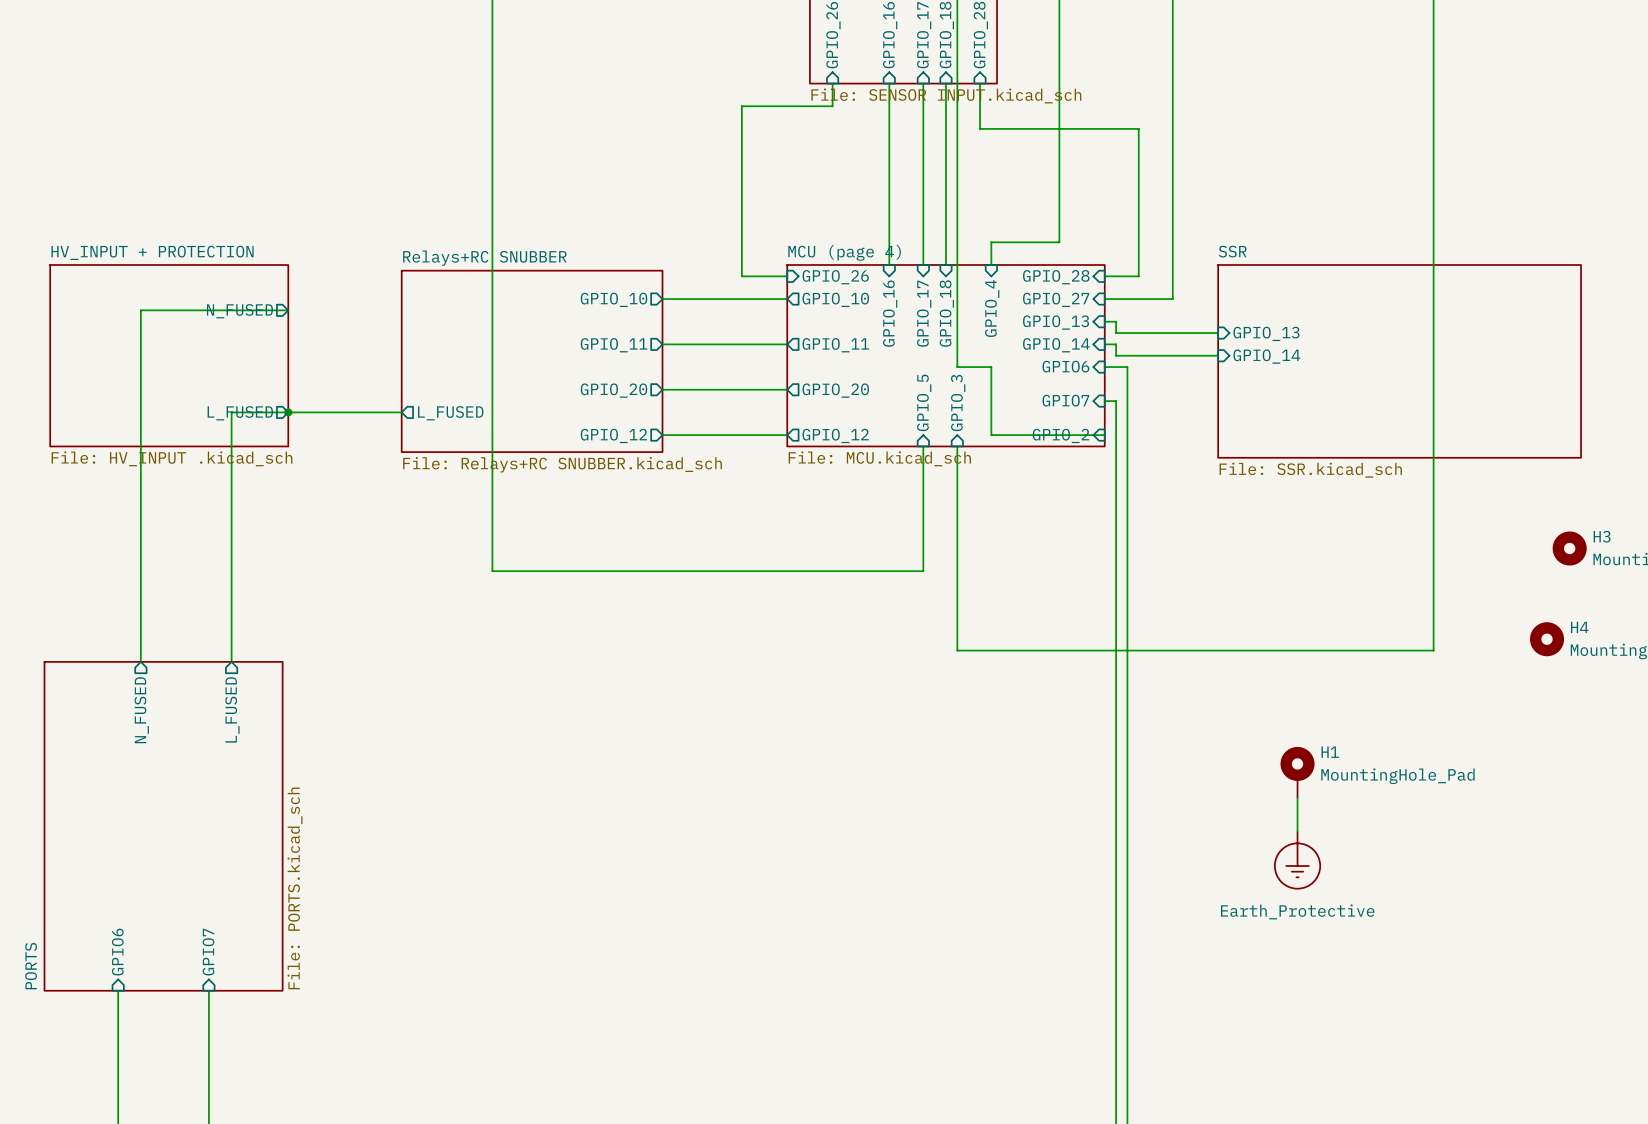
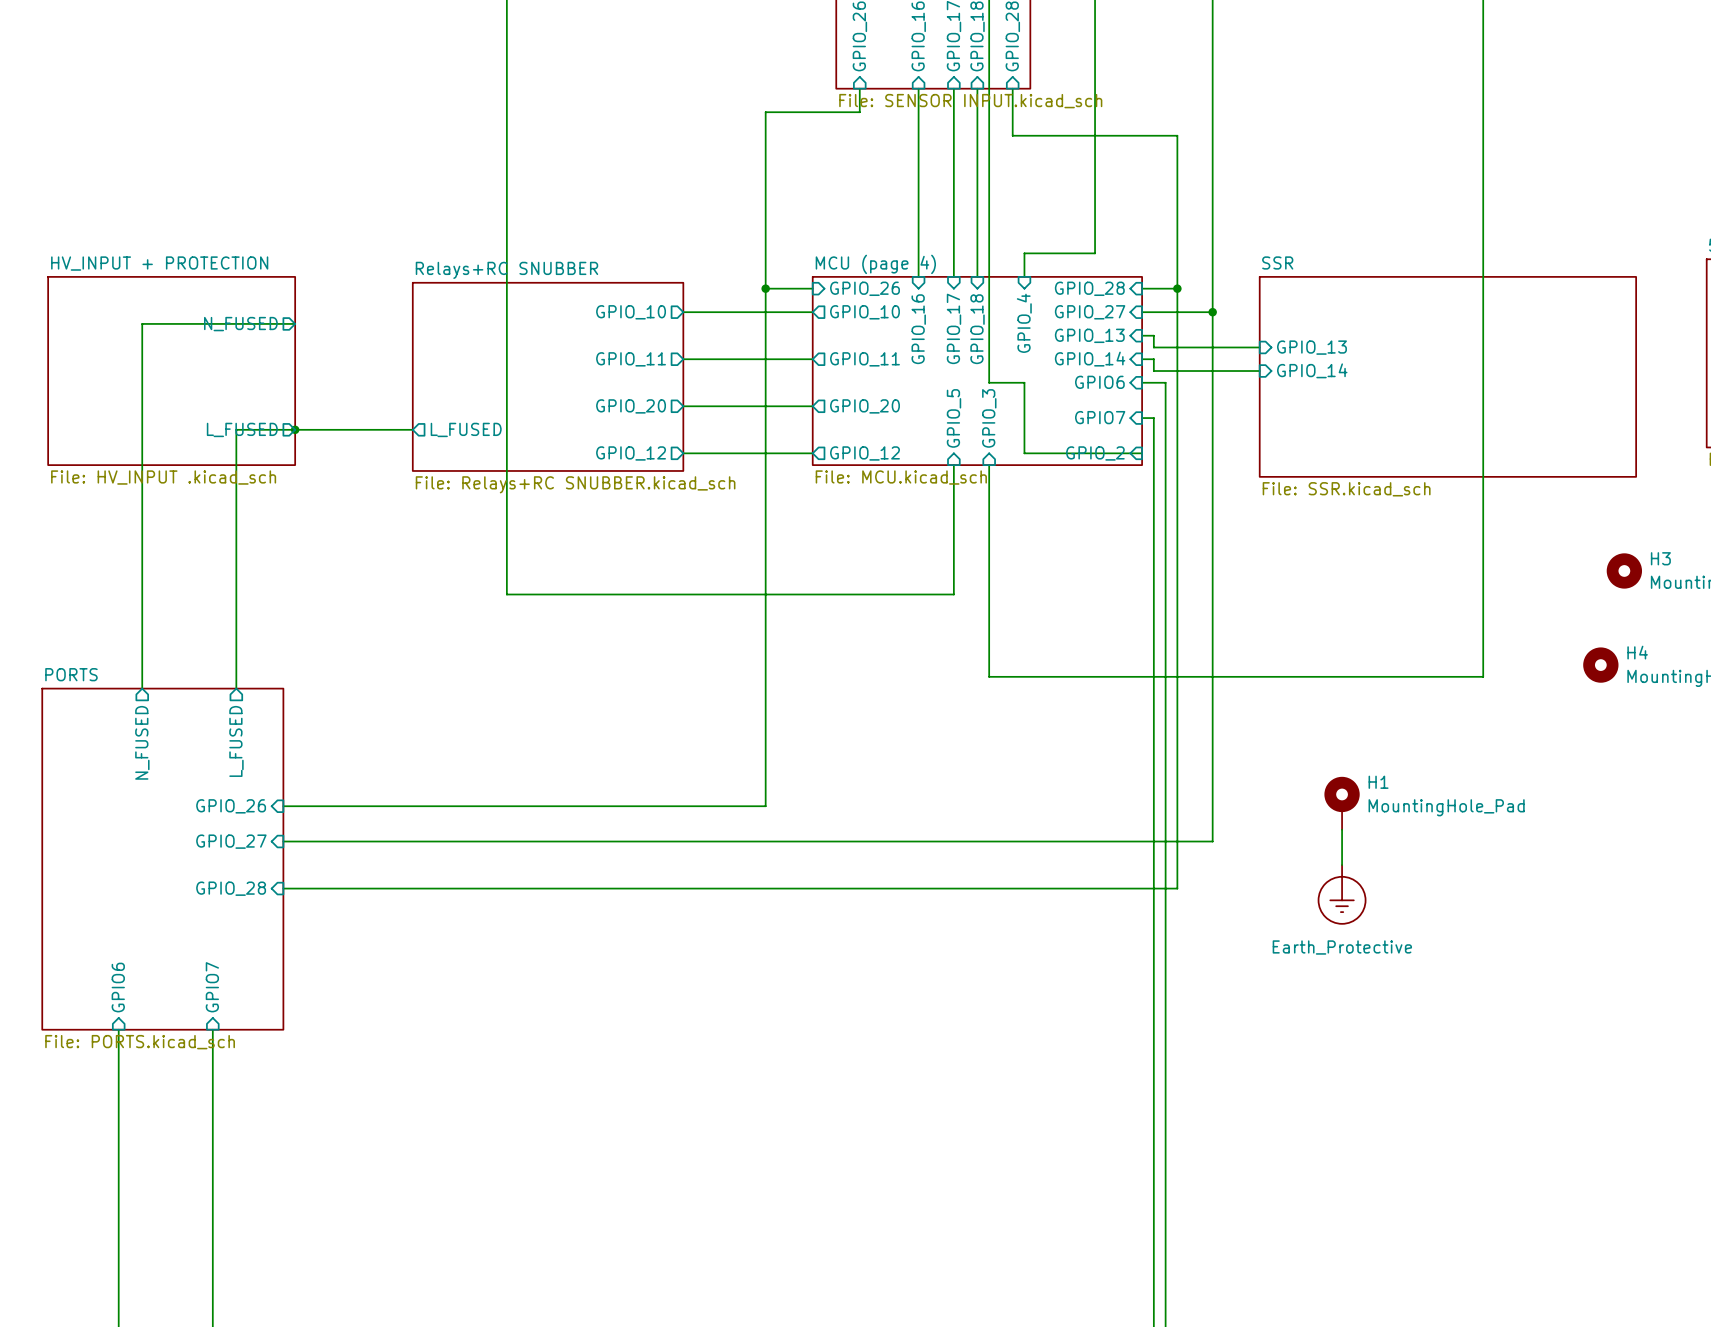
wire: none -> (765, 288) (765, 806) (283, 806)
junction: none -> (765, 288)
wire: none -> (1177, 288) (1177, 888) (283, 888)
junction: none -> (1177, 288)
wire: none -> (1212, 312) (1212, 841) (283, 841)
junction: none -> (1212, 312)
sheet PORTS shape: [43, 661, 284, 992] -> [41, 687, 285, 1031]
sheet pin: none -> GPIO_26 (231, 806)
sheet pin: none -> GPIO_27 (231, 841)
sheet pin: none -> GPIO_28 (231, 888)
sheet PORTS value rotation: 0° (295, 888) -> 90° clockwise (140, 1042)
sheet PORTS name rotation: 0° (31, 966) -> 90° clockwise (71, 674)
sheet PORTS name position: PORTS (31, 966) -> PORTS (71, 674)

